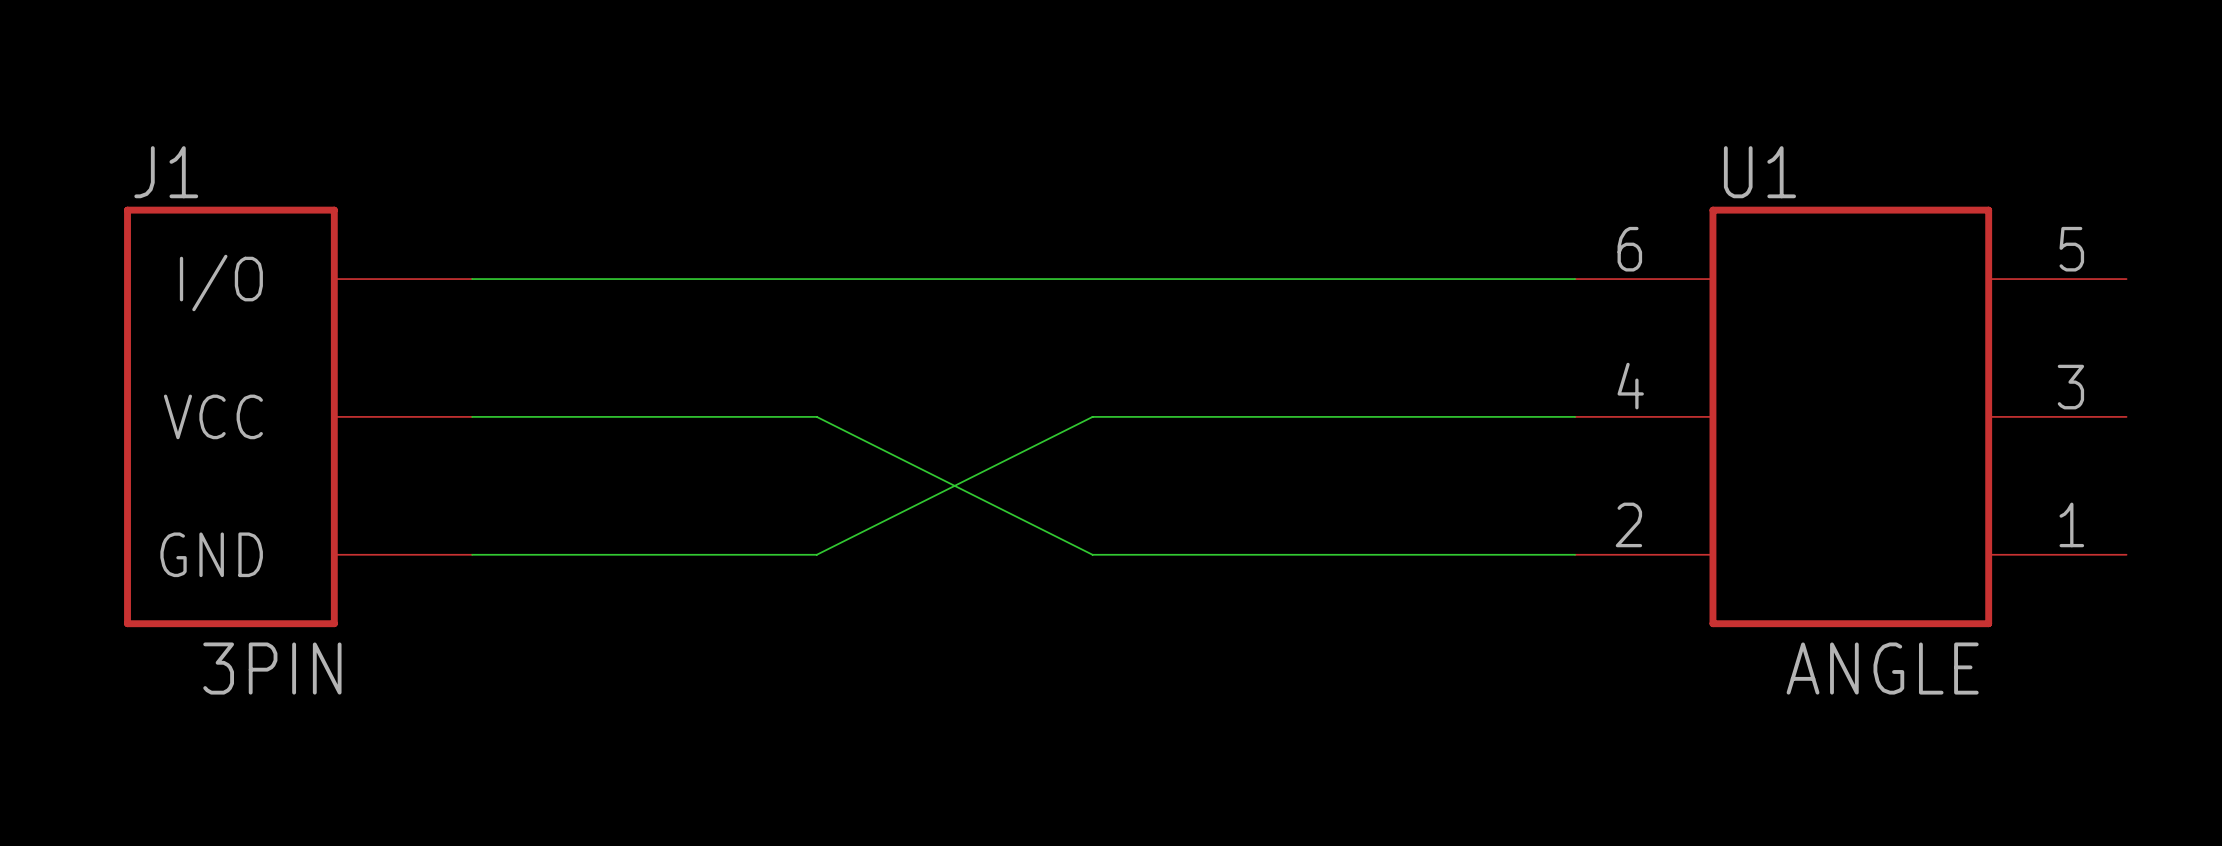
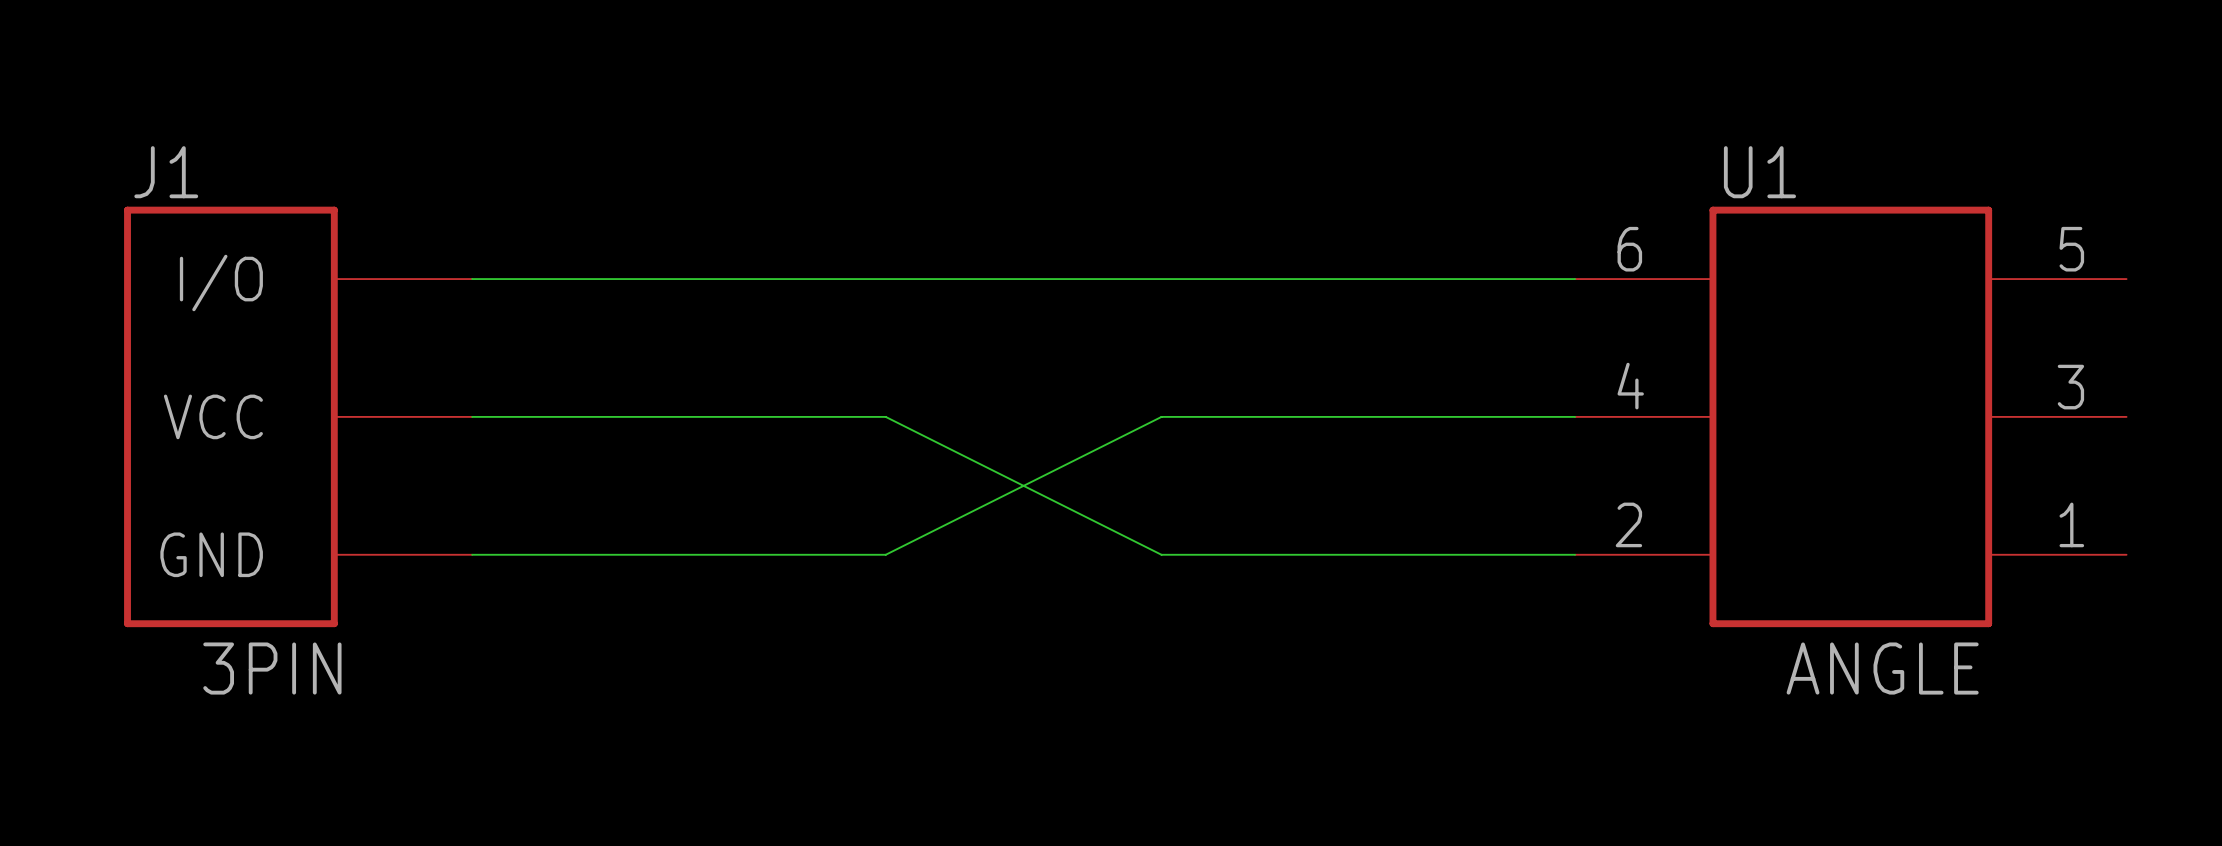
wire: (816, 416) (1092, 554) (1161, 554) -> (816, 416) (885, 416) (1161, 554)
wire: (1161, 416) (1092, 416) (816, 554) -> (1161, 416) (885, 554) (816, 554)

